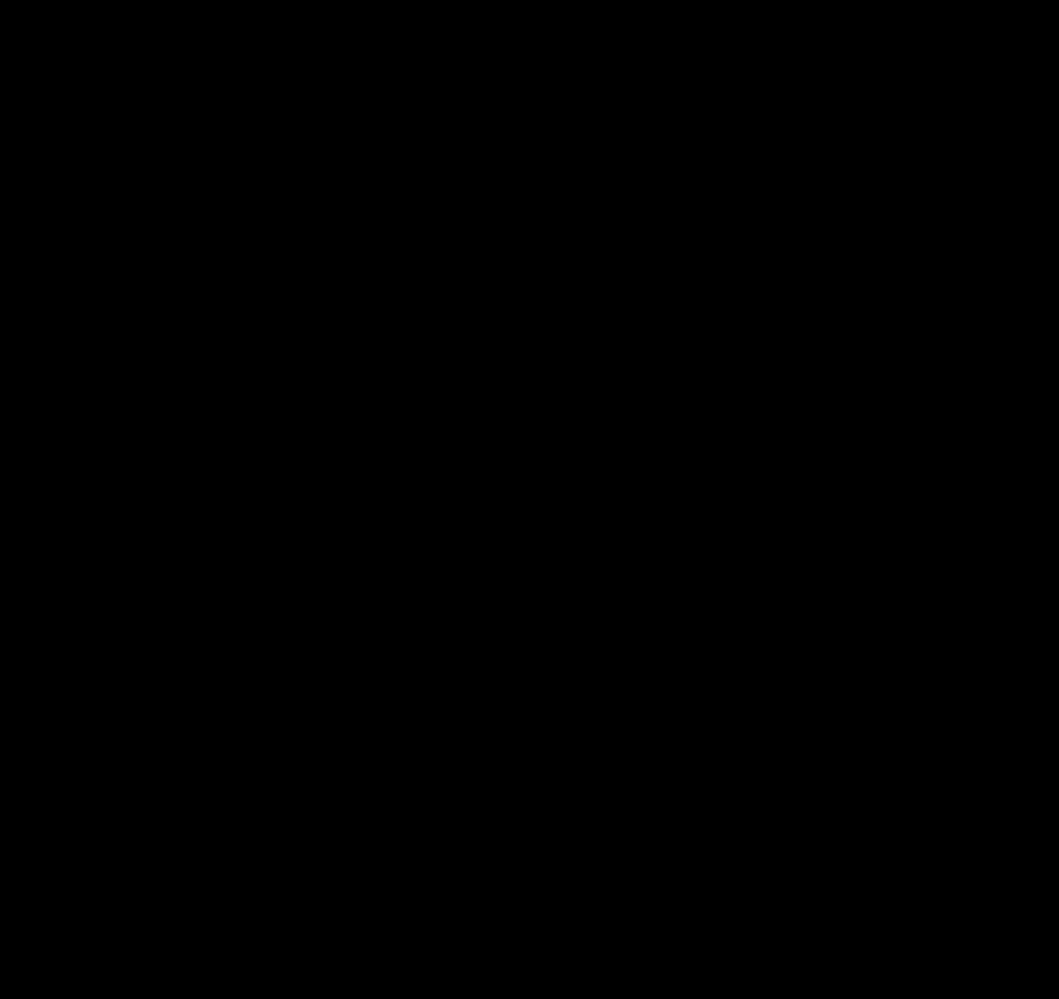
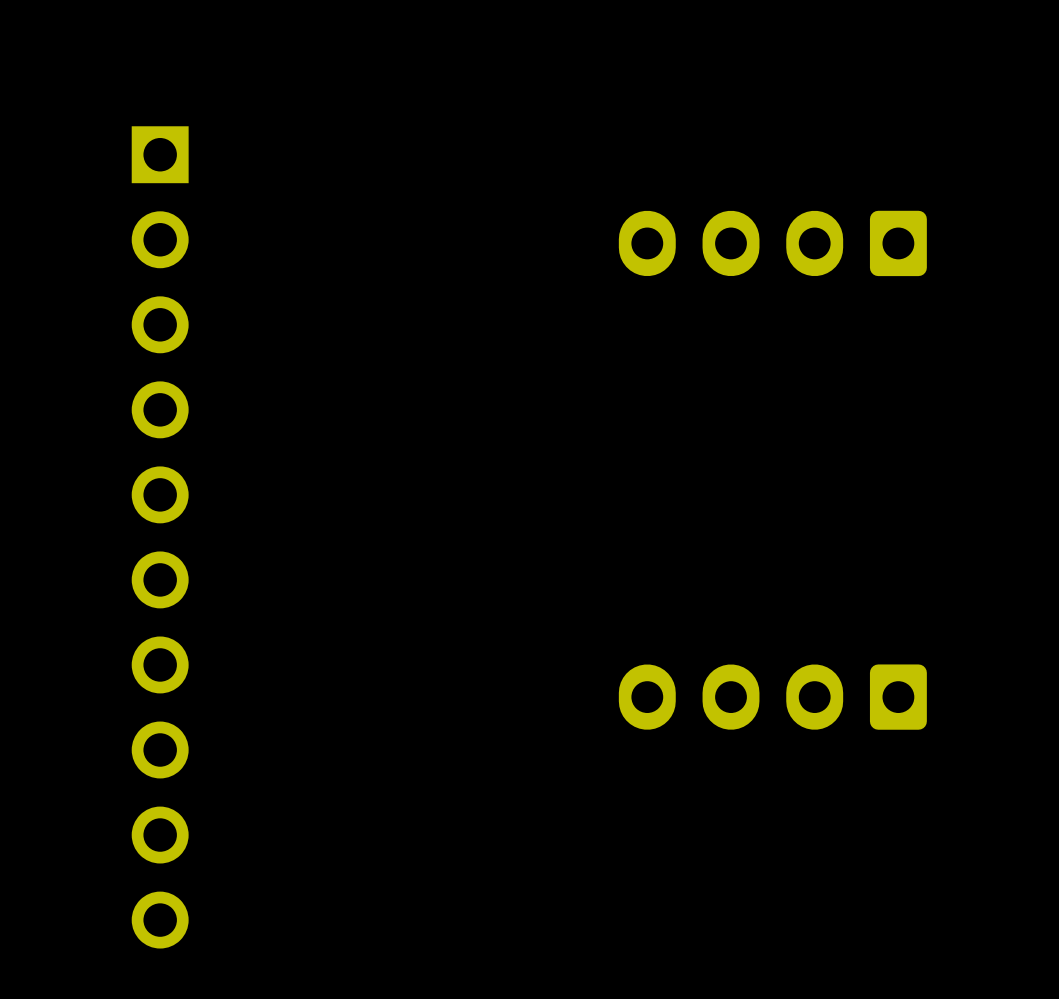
part: none -> (772, 243)
part: none -> (160, 537)
part: none -> (772, 697)

